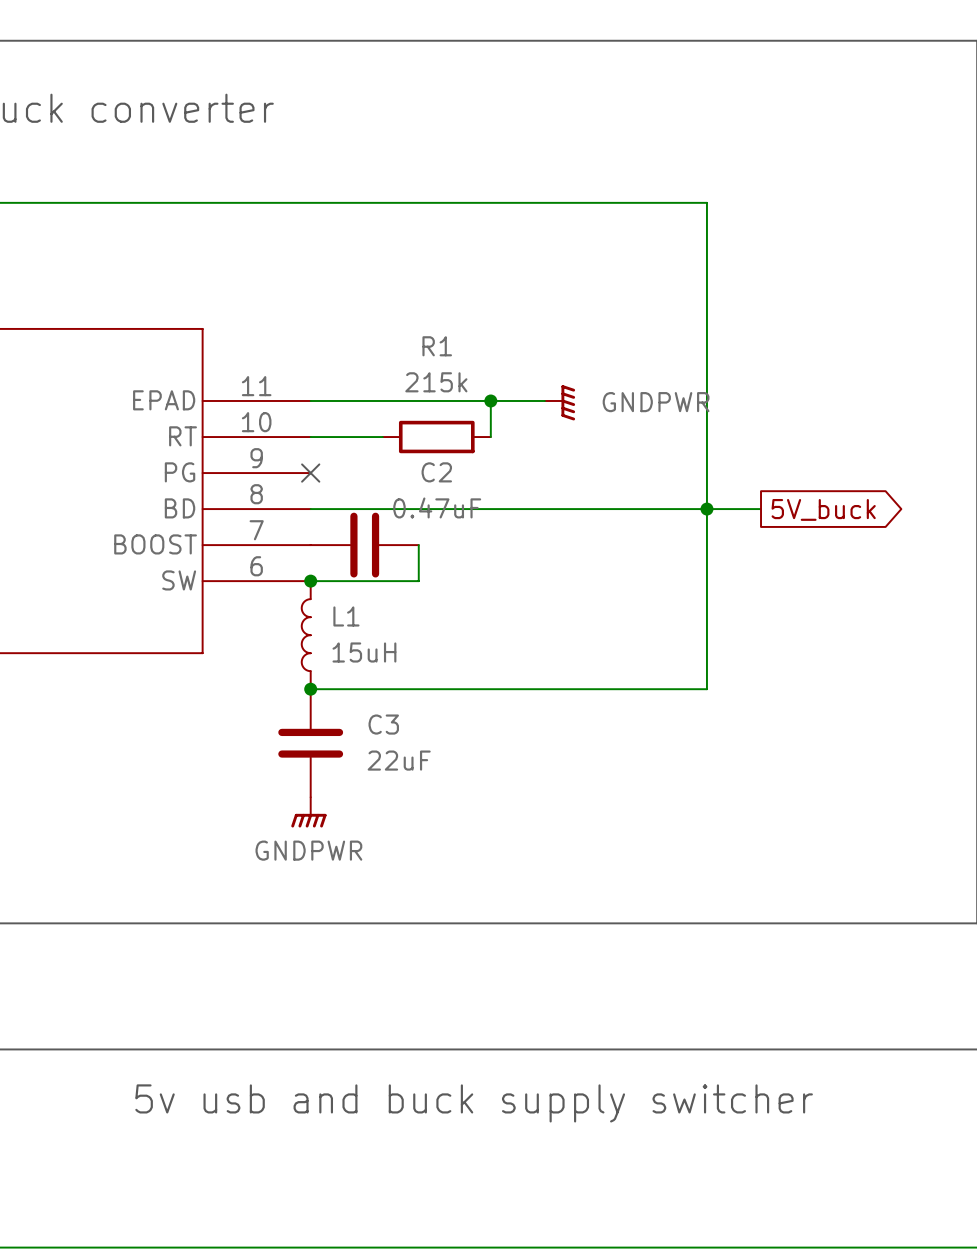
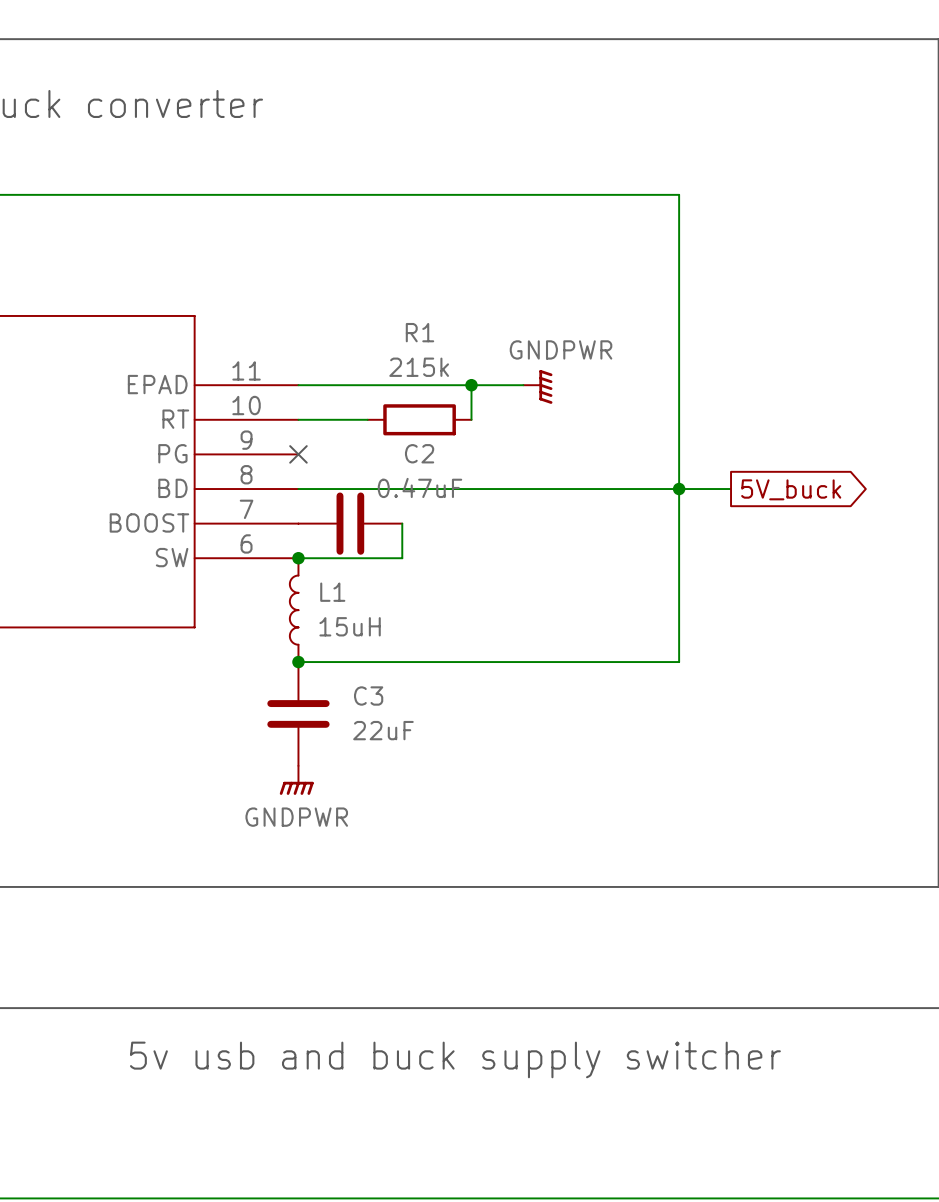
power symbol text position: GNDPWR (656, 402) -> GNDPWR (561, 349)

